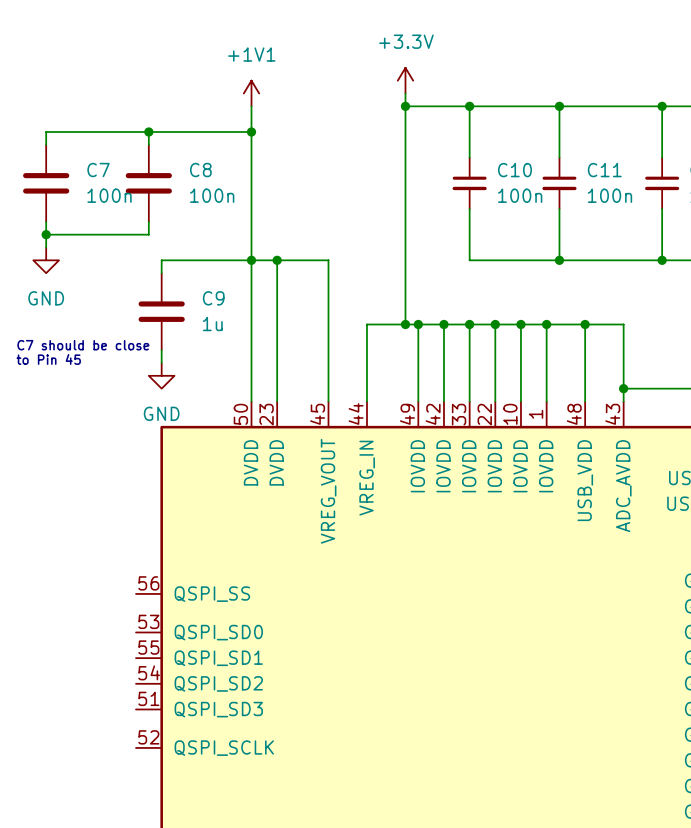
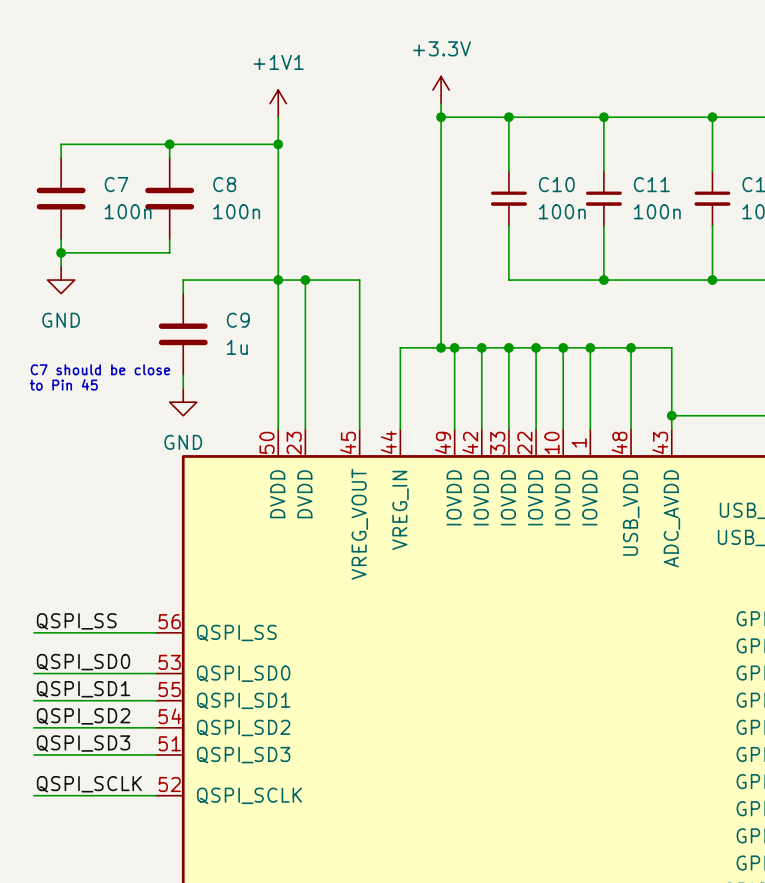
label: none -> QSPI_SS (76, 621)
wire: none -> (33, 632) (156, 632)
label: none -> QSPI_SD0 (83, 662)
wire: none -> (33, 673) (156, 673)
label: none -> QSPI_SD1 (83, 689)
wire: none -> (33, 700) (156, 700)
label: none -> QSPI_SD2 (83, 716)
wire: none -> (33, 727) (156, 727)
label: none -> QSPI_SD3 (83, 743)
wire: none -> (33, 754) (156, 754)
label: none -> QSPI_SCLK (89, 784)
wire: none -> (33, 795) (156, 795)

